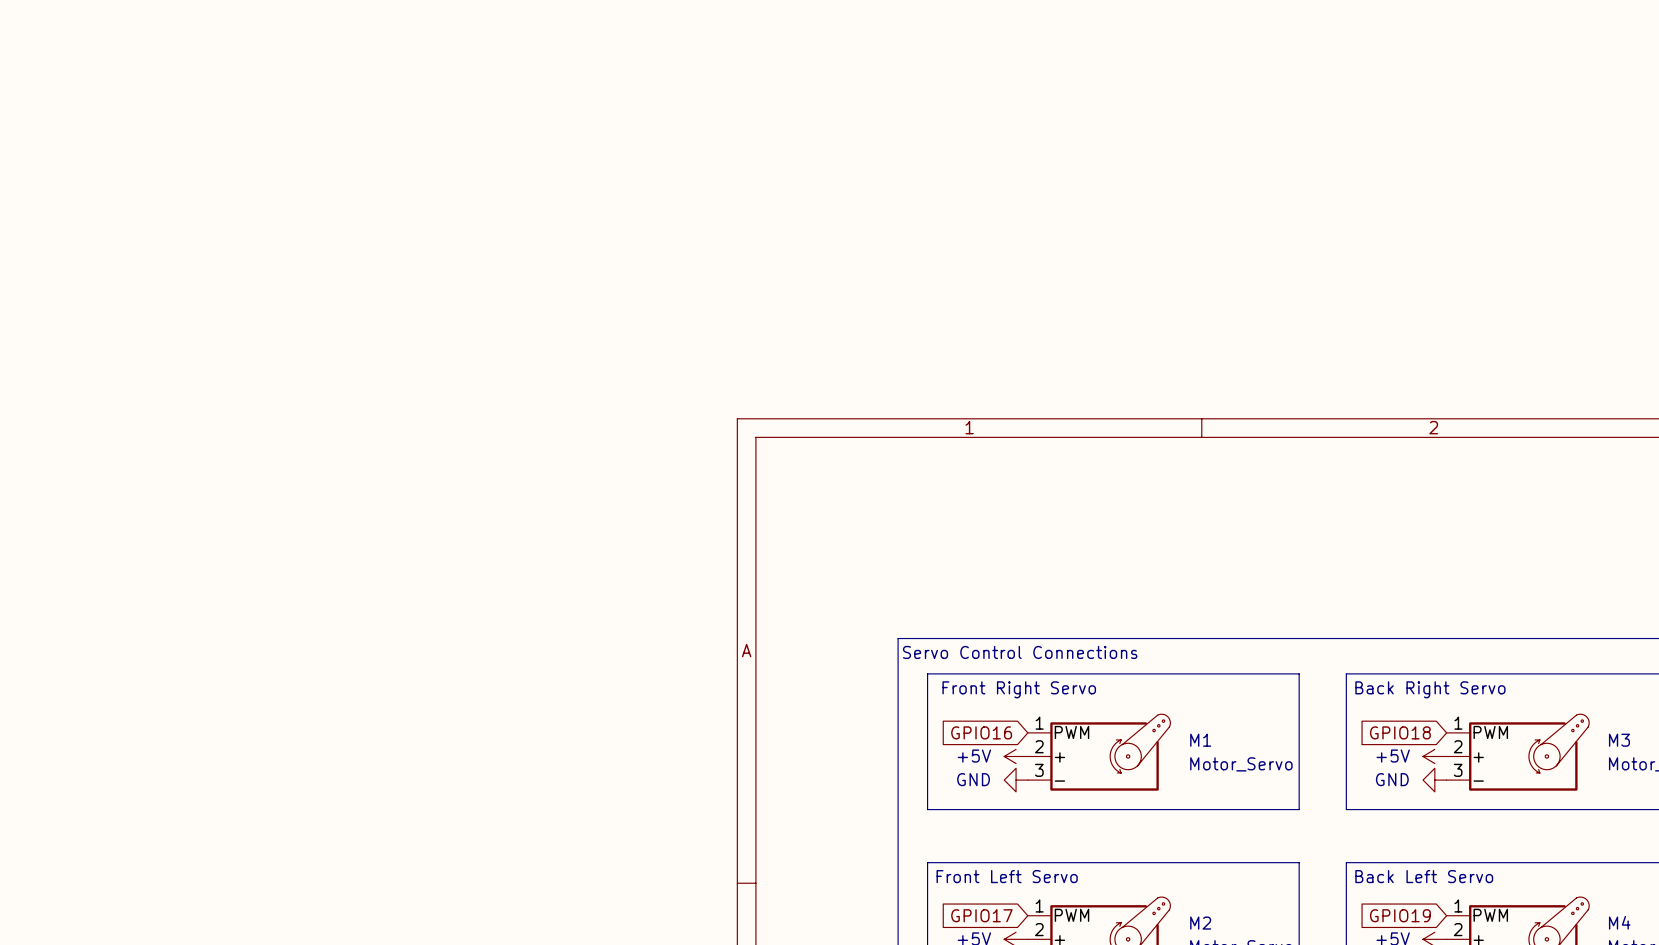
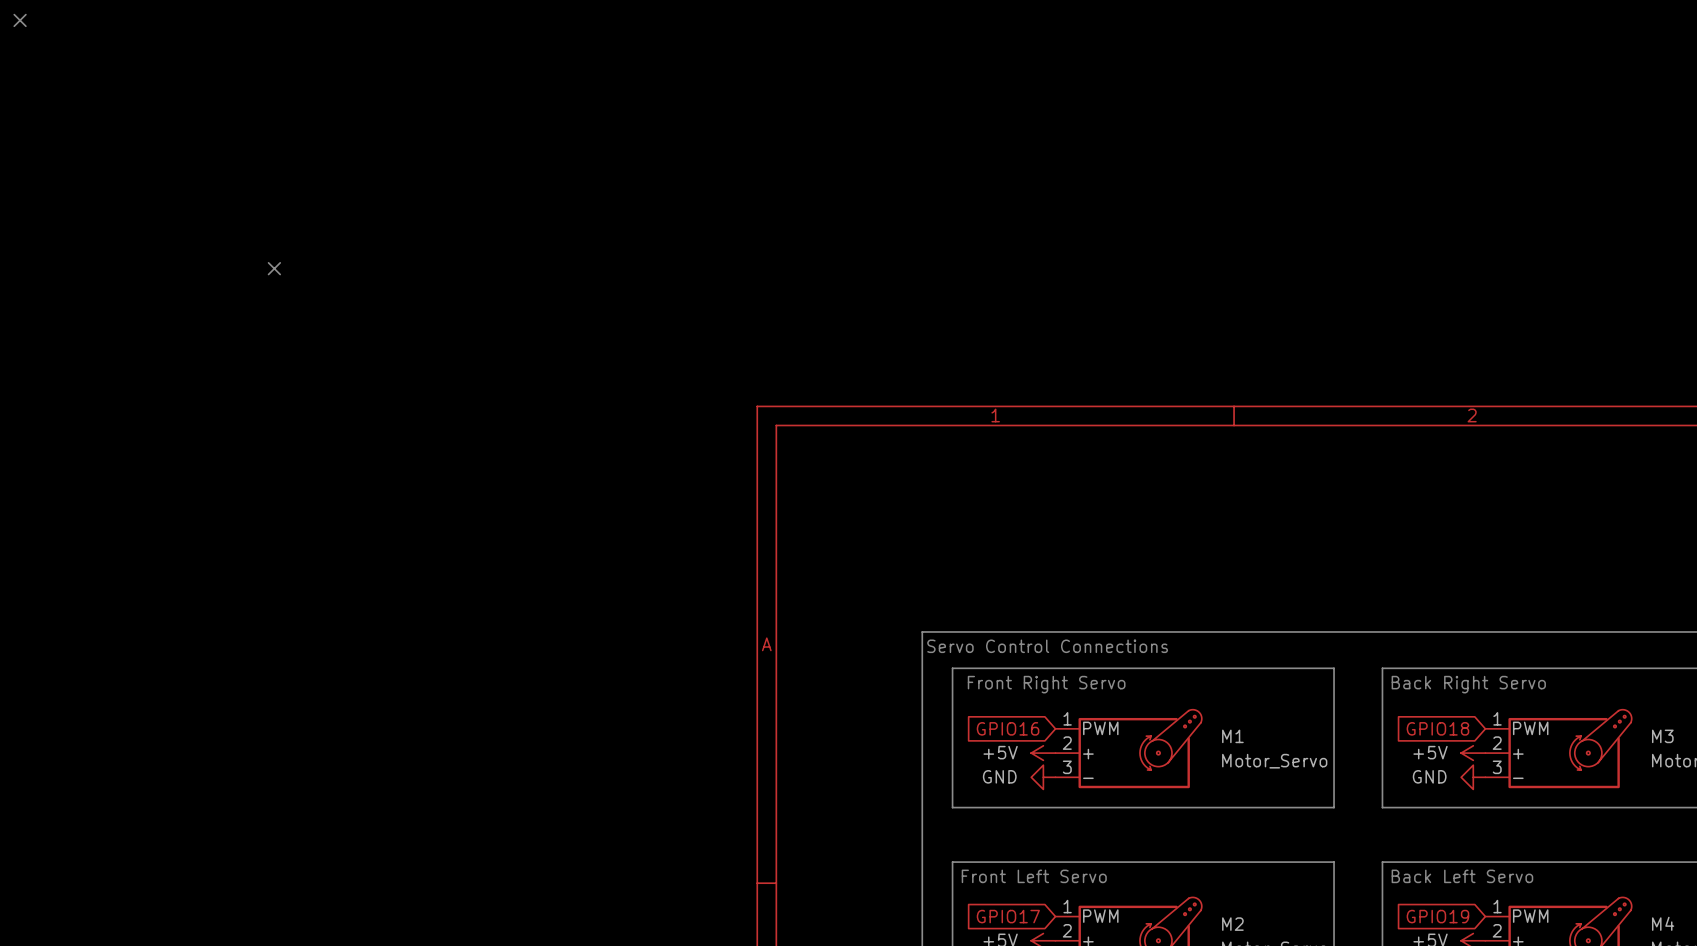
no-connect mark: none -> (20, 20)
no-connect mark: none -> (274, 268)

